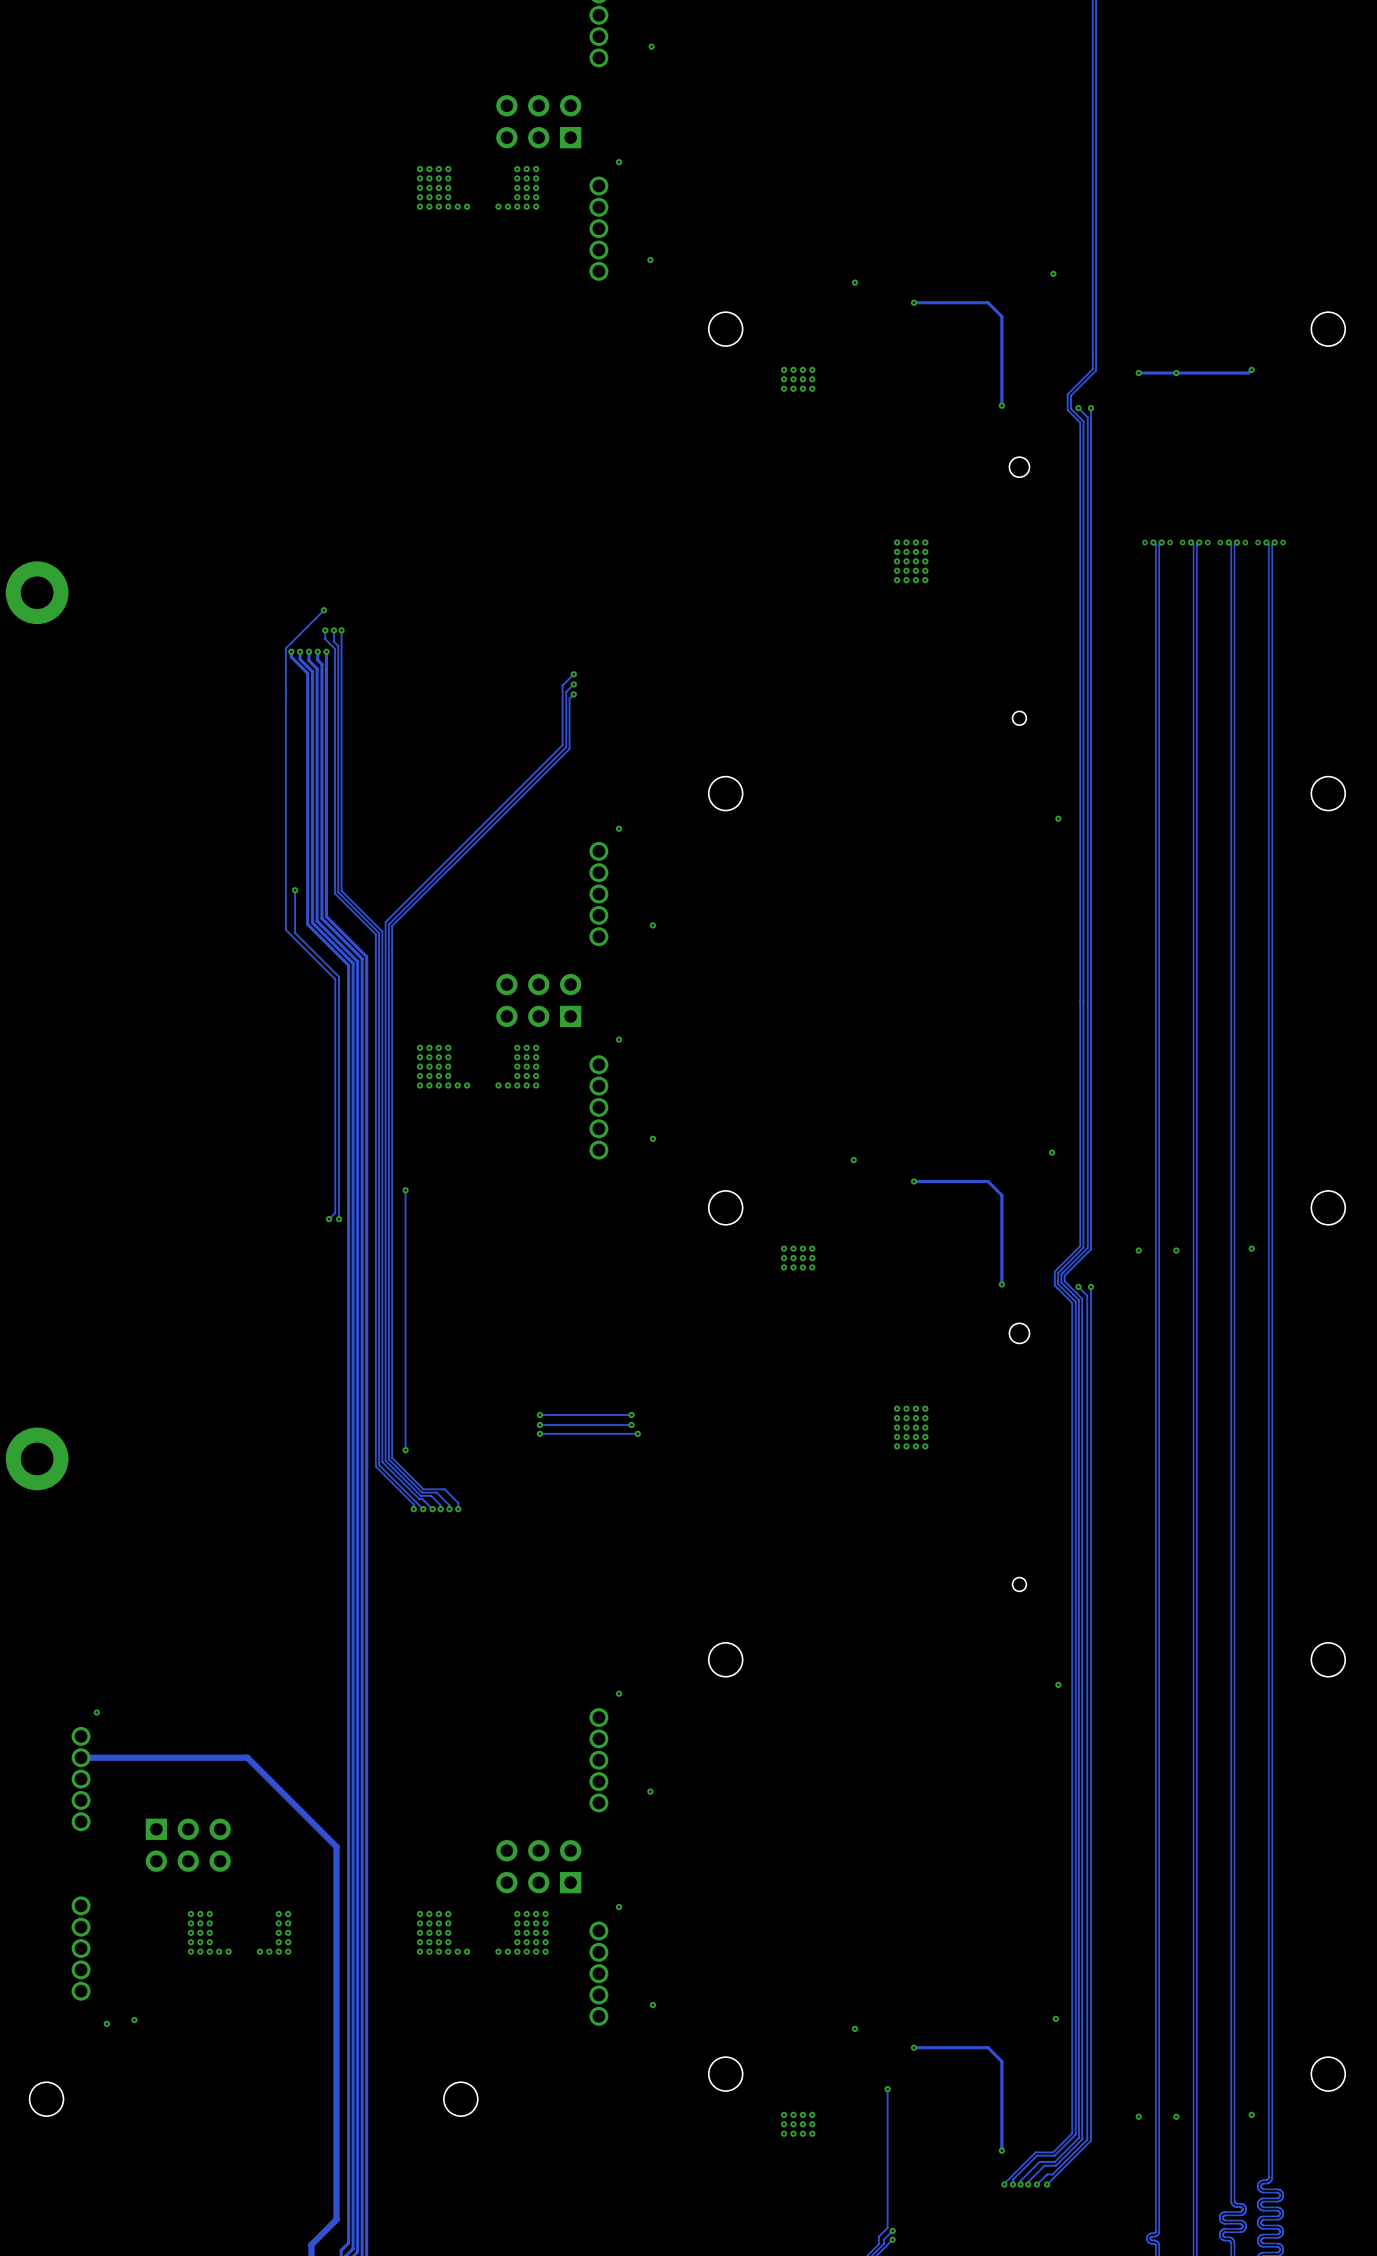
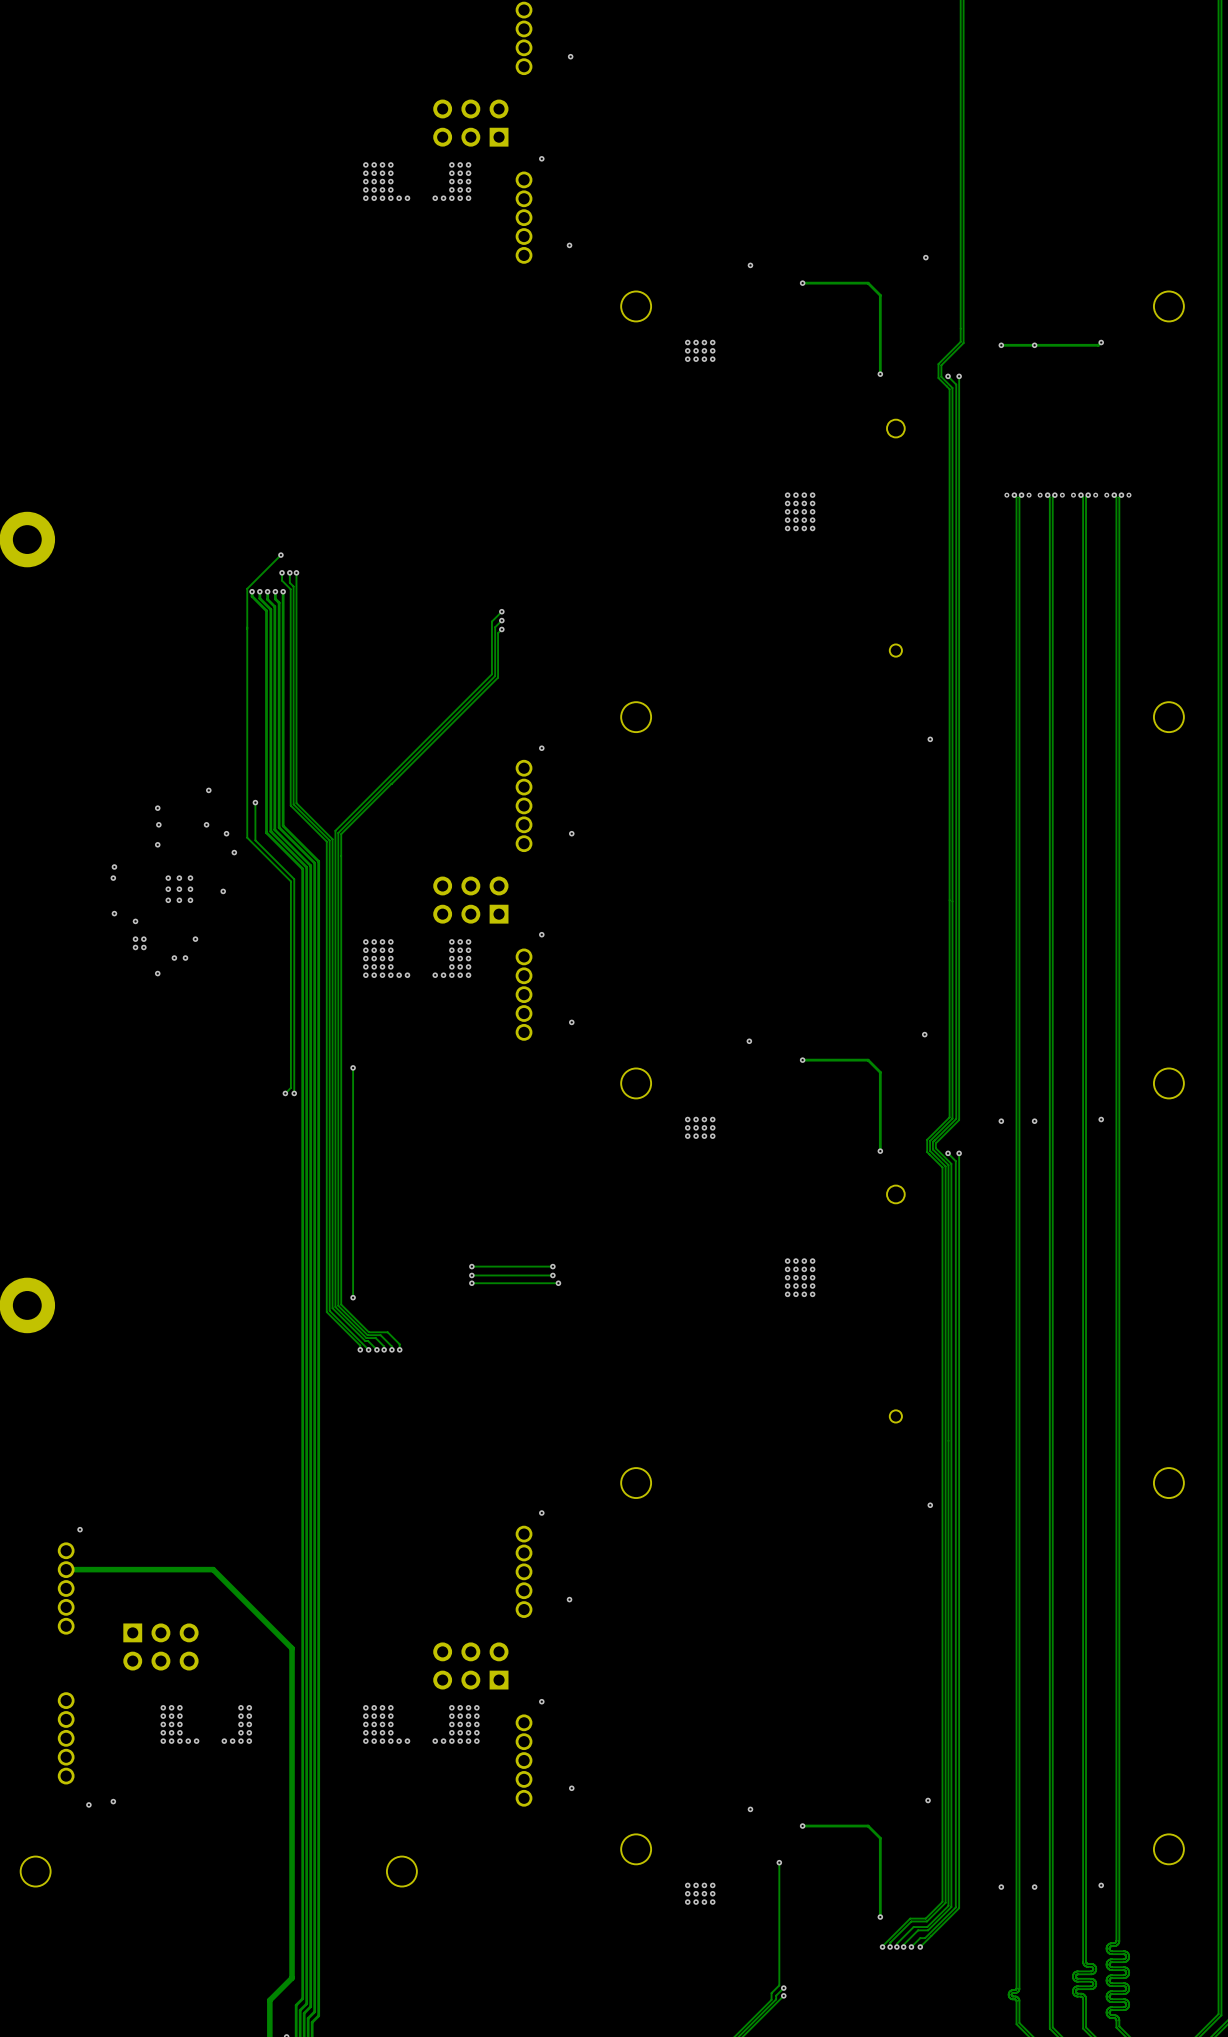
via: none -> (208, 790)
via: none -> (157, 808)
via: none -> (158, 824)
via: none -> (206, 824)
via: none -> (226, 833)
via: none -> (157, 844)
via: none -> (234, 852)
via: none -> (114, 867)
via: none -> (113, 878)
via: none -> (168, 878)
via: none -> (179, 878)
via: none -> (190, 878)
via: none -> (168, 889)
via: none -> (179, 889)
via: none -> (190, 889)
via: none -> (223, 891)
via: none -> (168, 900)
via: none -> (179, 900)
via: none -> (190, 900)
via: none -> (114, 913)
via: none -> (135, 921)
via: none -> (135, 939)
via: none -> (143, 939)
via: none -> (195, 939)
via: none -> (135, 947)
via: none -> (143, 947)
via: none -> (174, 958)
via: none -> (185, 958)
via: none -> (157, 973)

